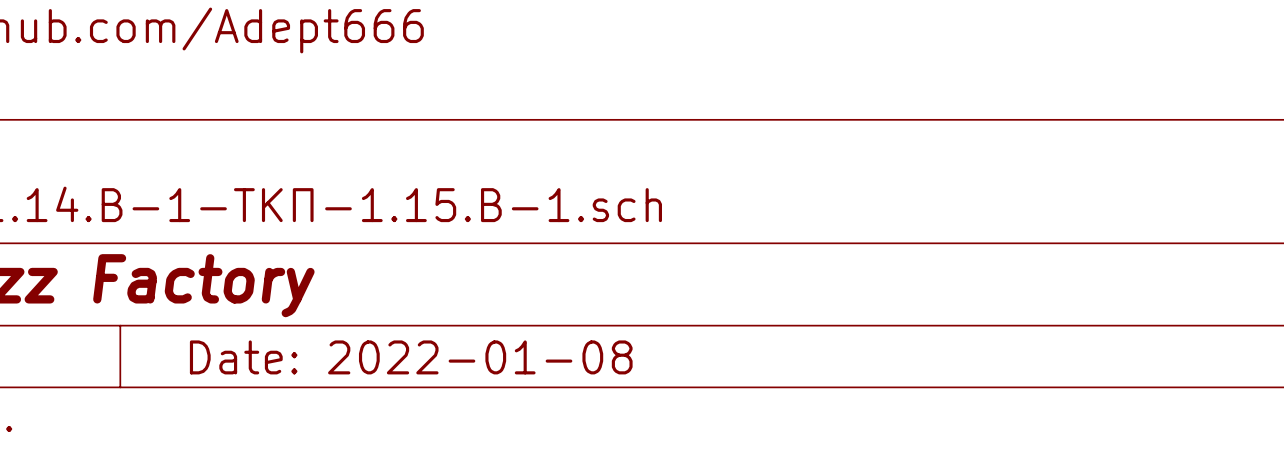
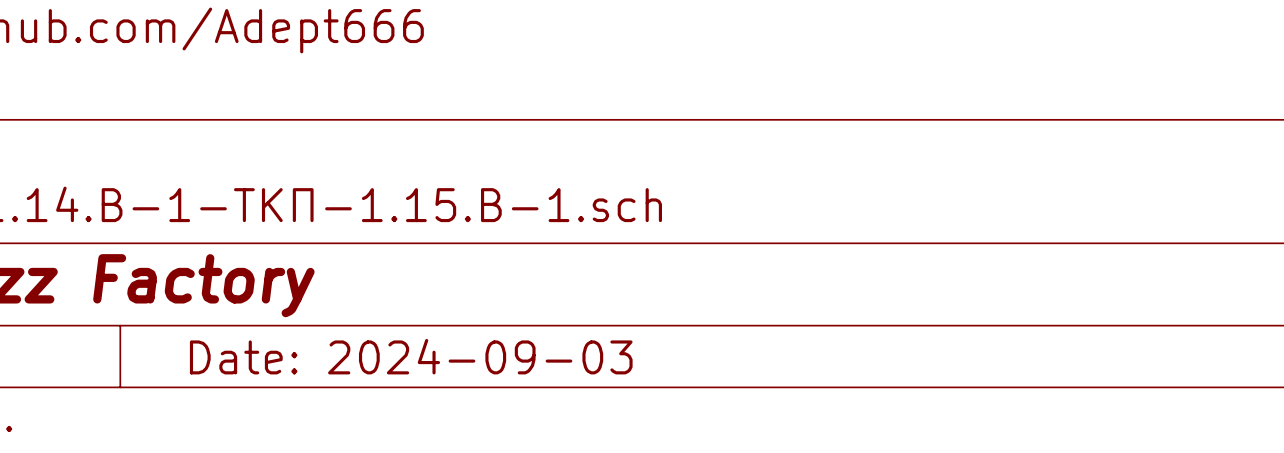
title block: Date: 2022-01-08 (411, 357) -> Date: 2024-09-03 (411, 356)

